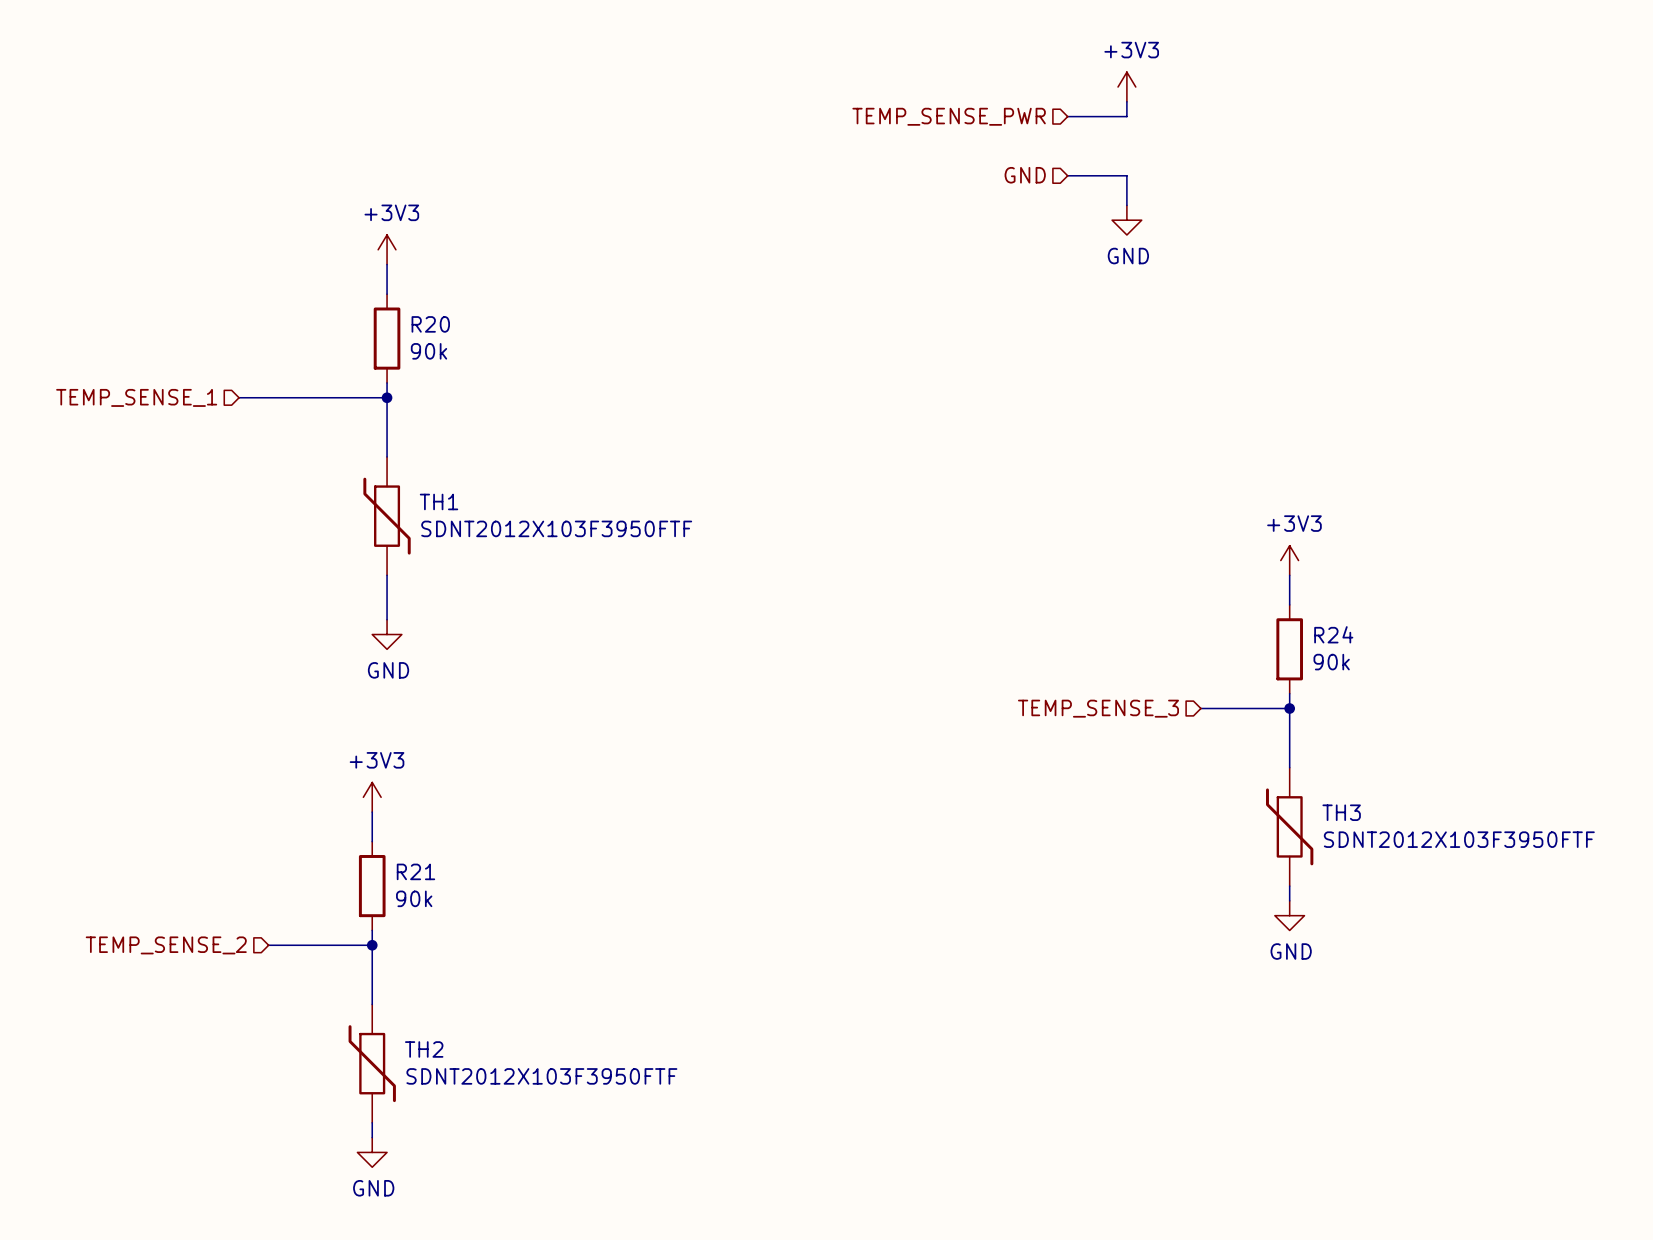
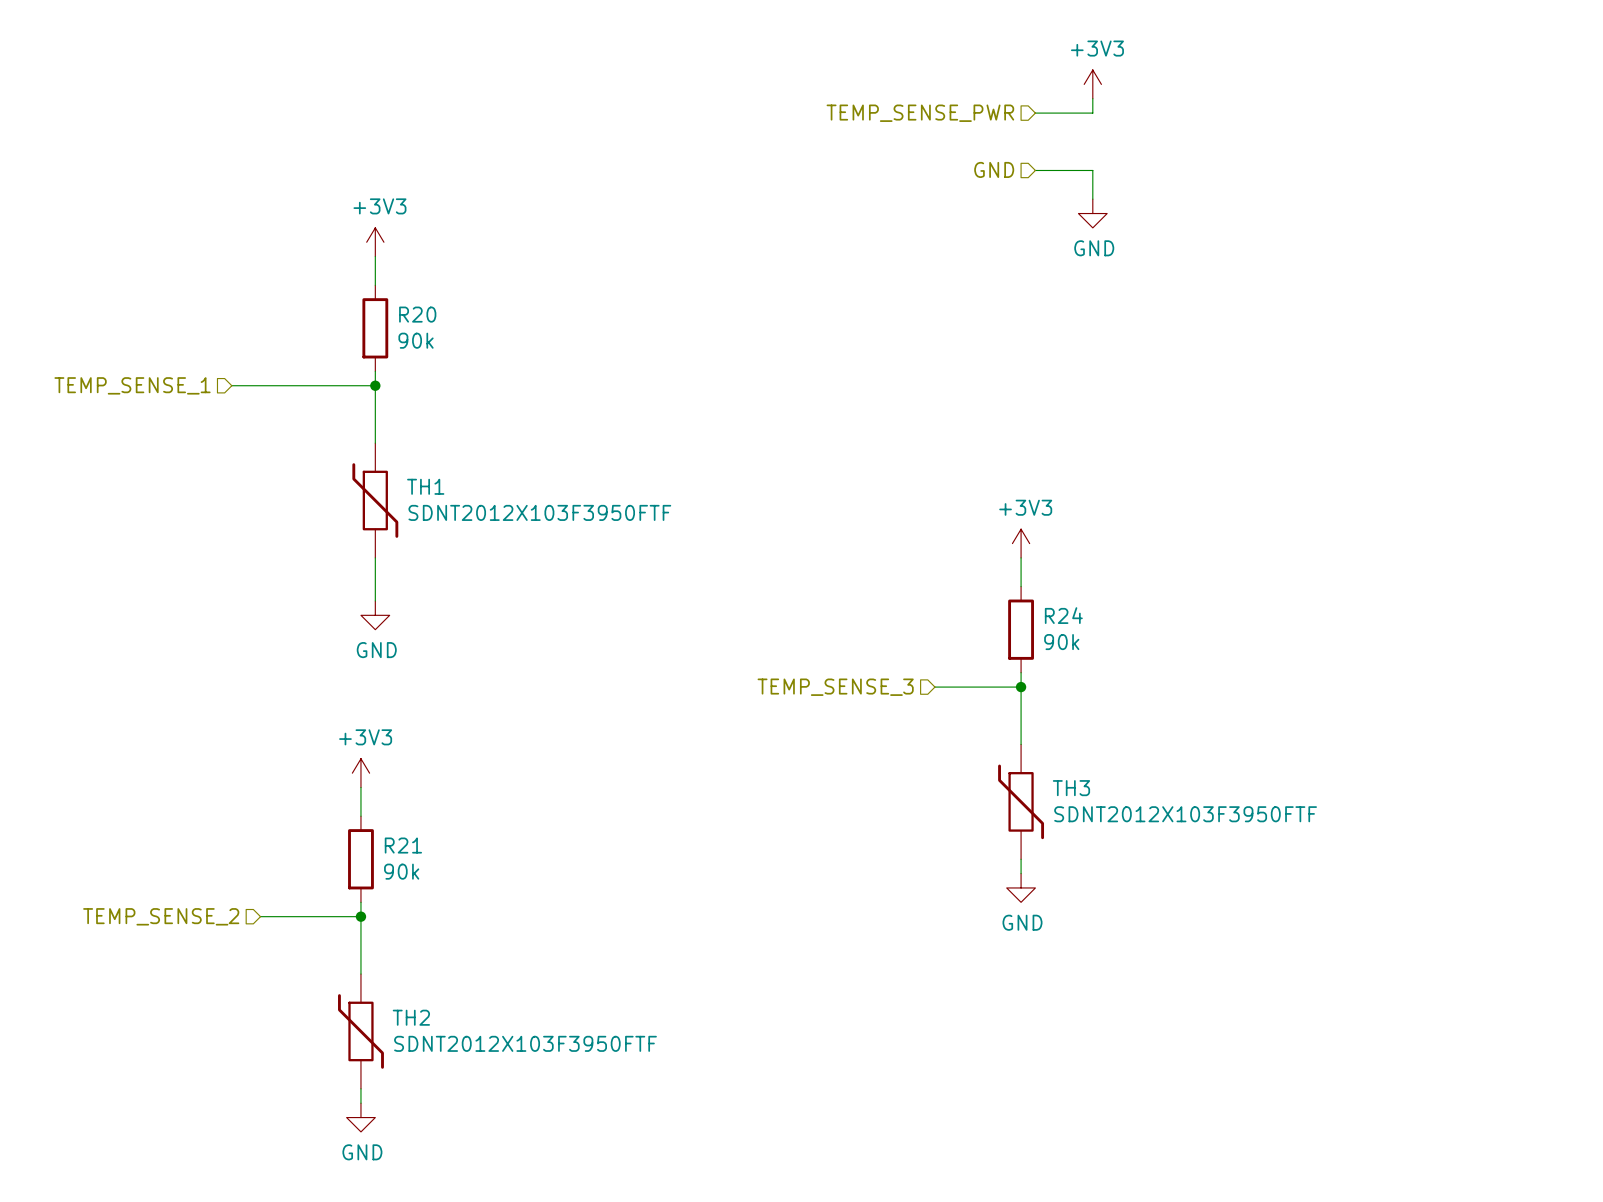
power symbol position: +3V3 (1289, 560) -> +3V3 (1021, 543)
wire: (1289, 575) (1289, 604) -> (1021, 557) (1021, 586)
R24 position: (1289, 649) -> (1021, 629)
wire: (1289, 693) (1289, 767) -> (1021, 672) (1021, 744)
junction: none -> (1021, 687)
hierarchical label position: TEMP_SENSE_3 (1098, 708) -> TEMP_SENSE_3 (835, 687)
wire: (1200, 708) (1289, 708) -> (934, 687) (1021, 687)
junction: (1289, 708) -> none
TH3 position: (1289, 826) -> (1021, 801)
wire: (1289, 886) (1289, 900) -> (1021, 859) (1021, 873)
power symbol position: GND (1289, 915) -> GND (1021, 887)

